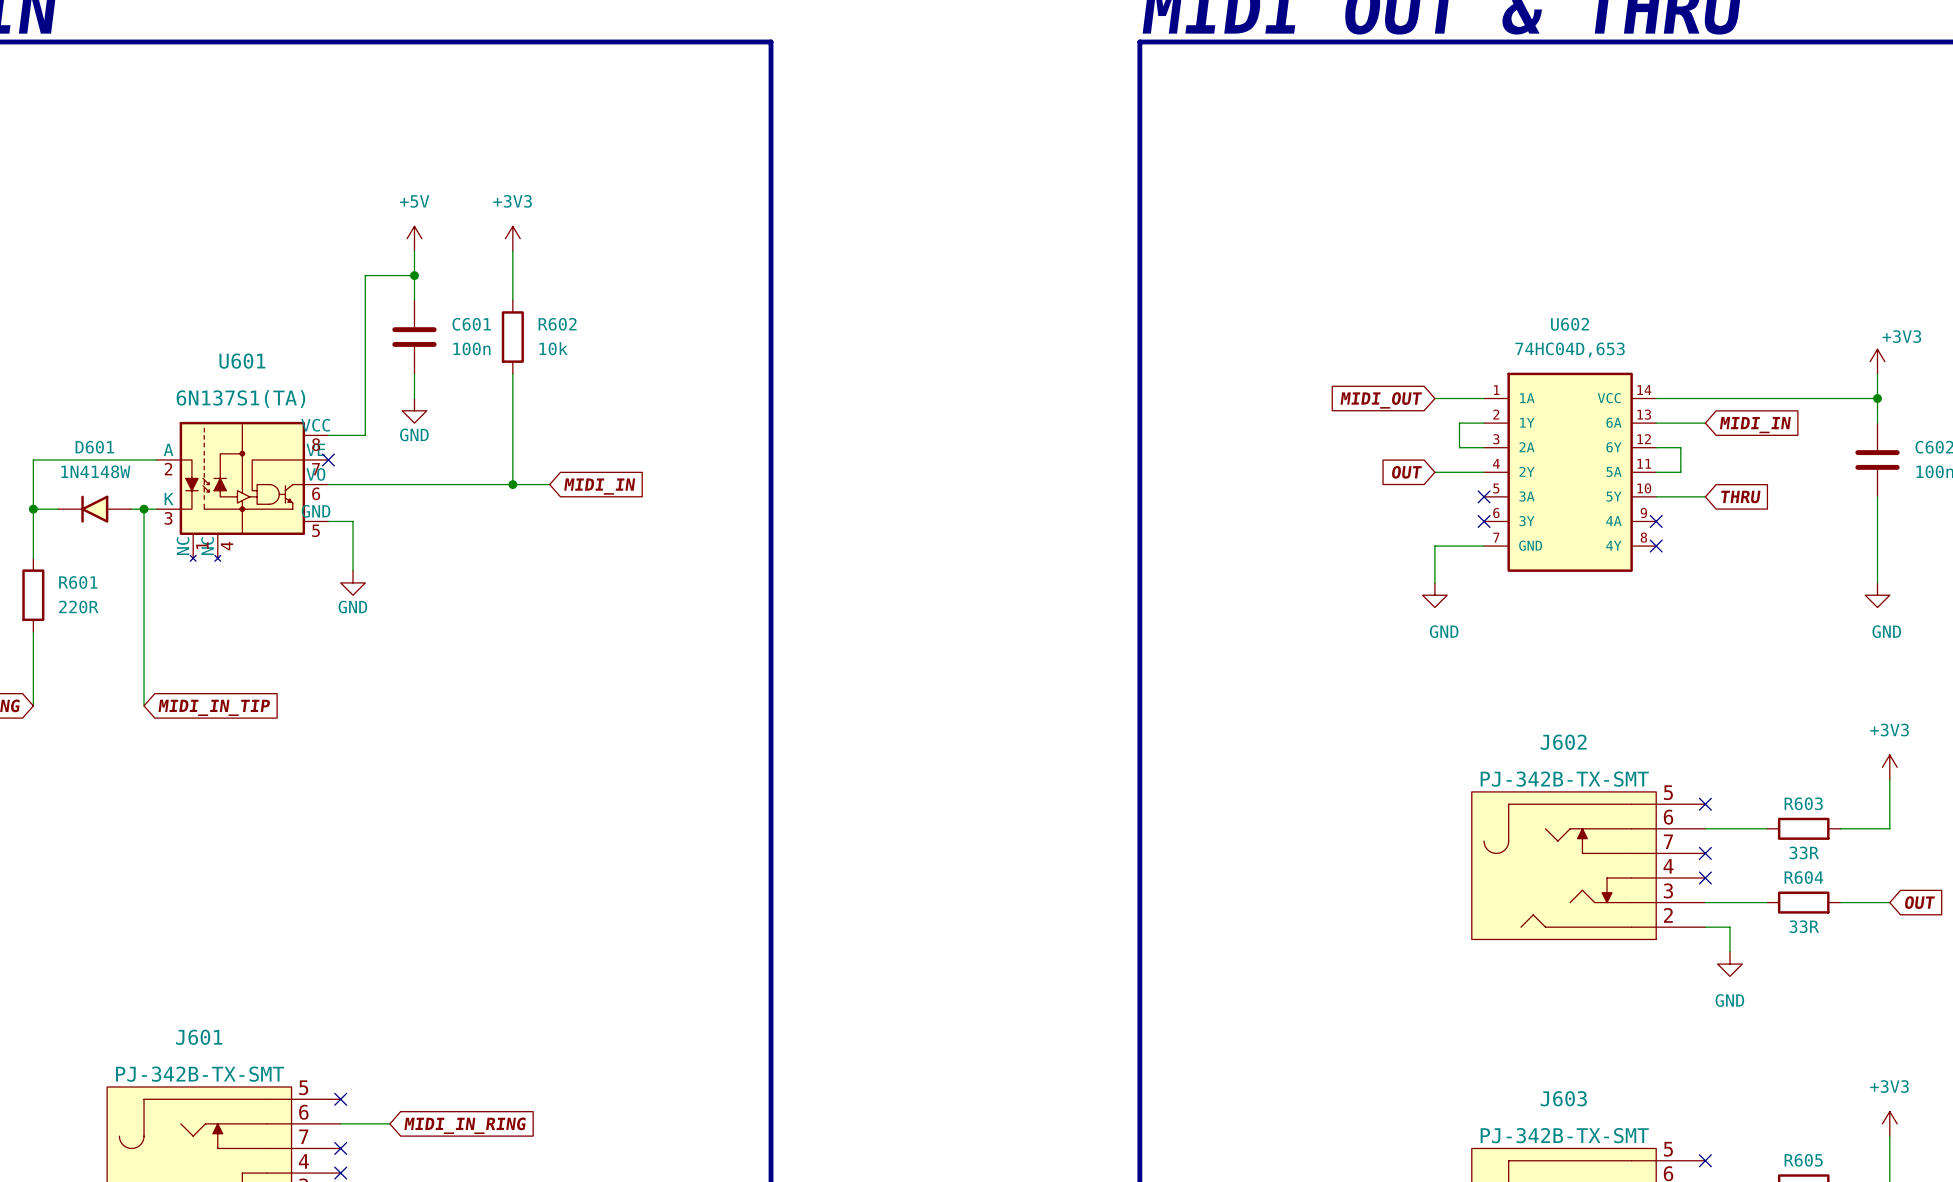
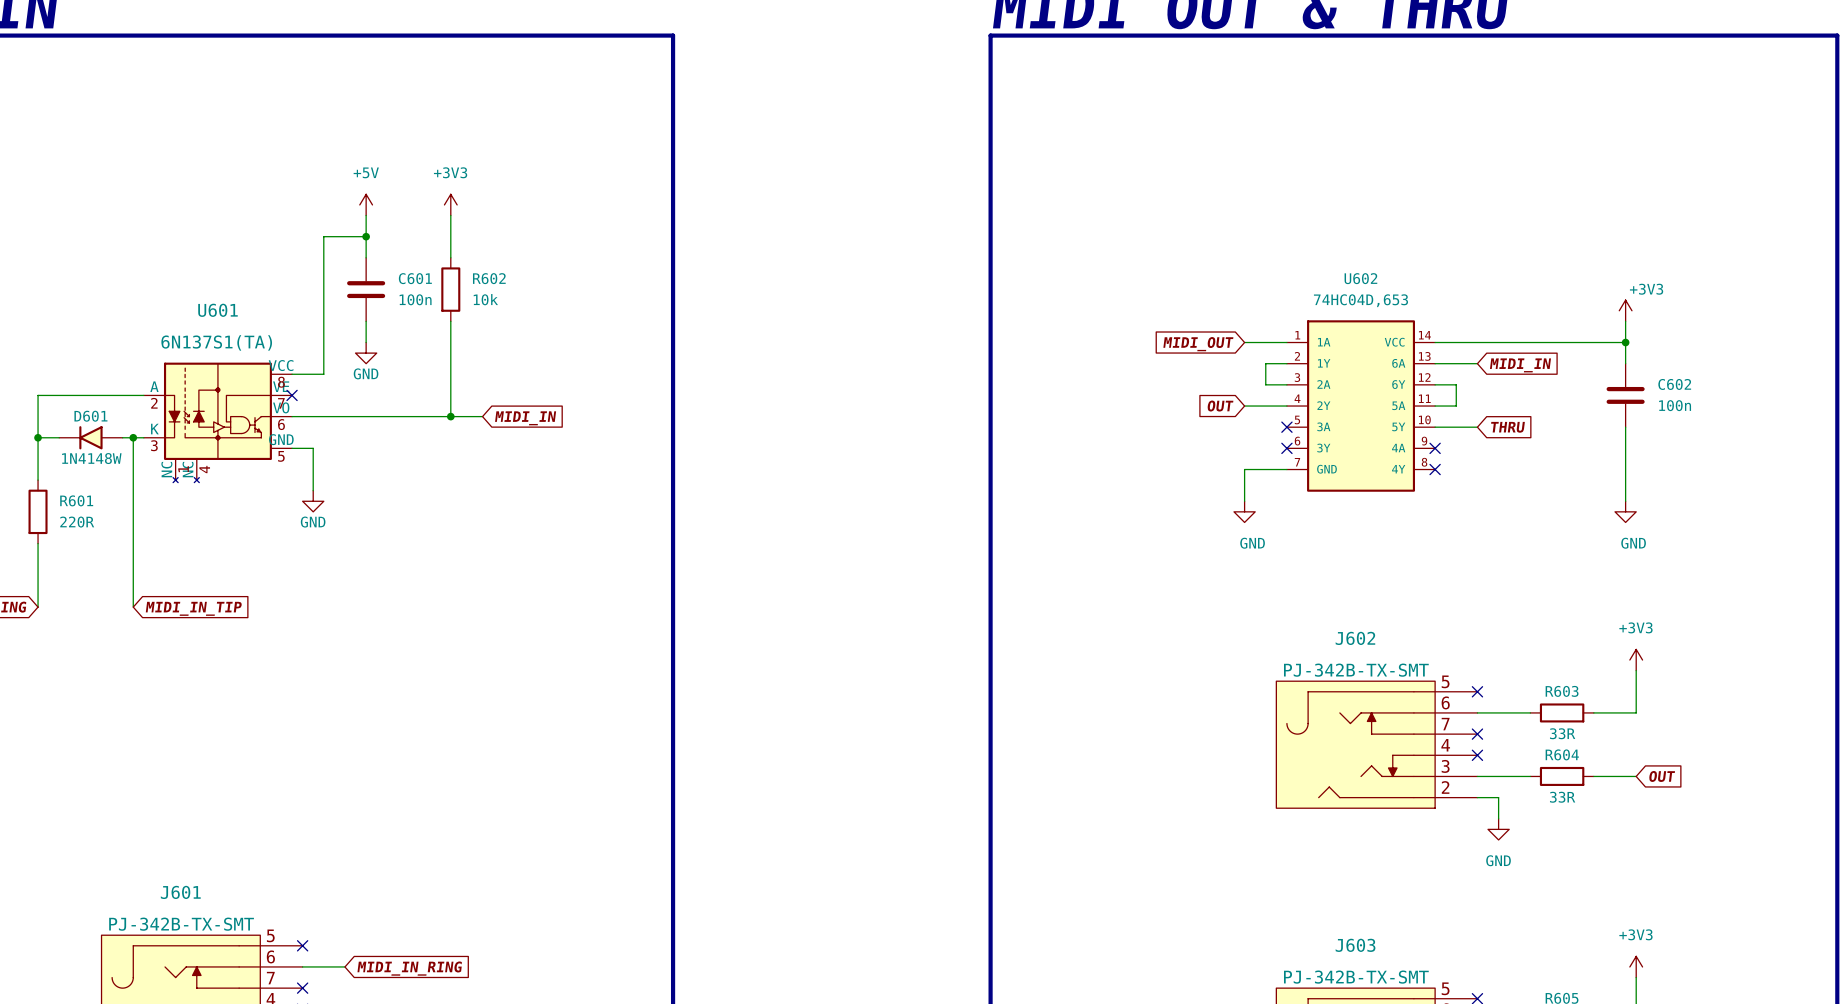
D601 name position: D601 (94, 447) -> D601 (90, 416)
D601 value position: 1N4148W (95, 471) -> 1N4148W (91, 458)

